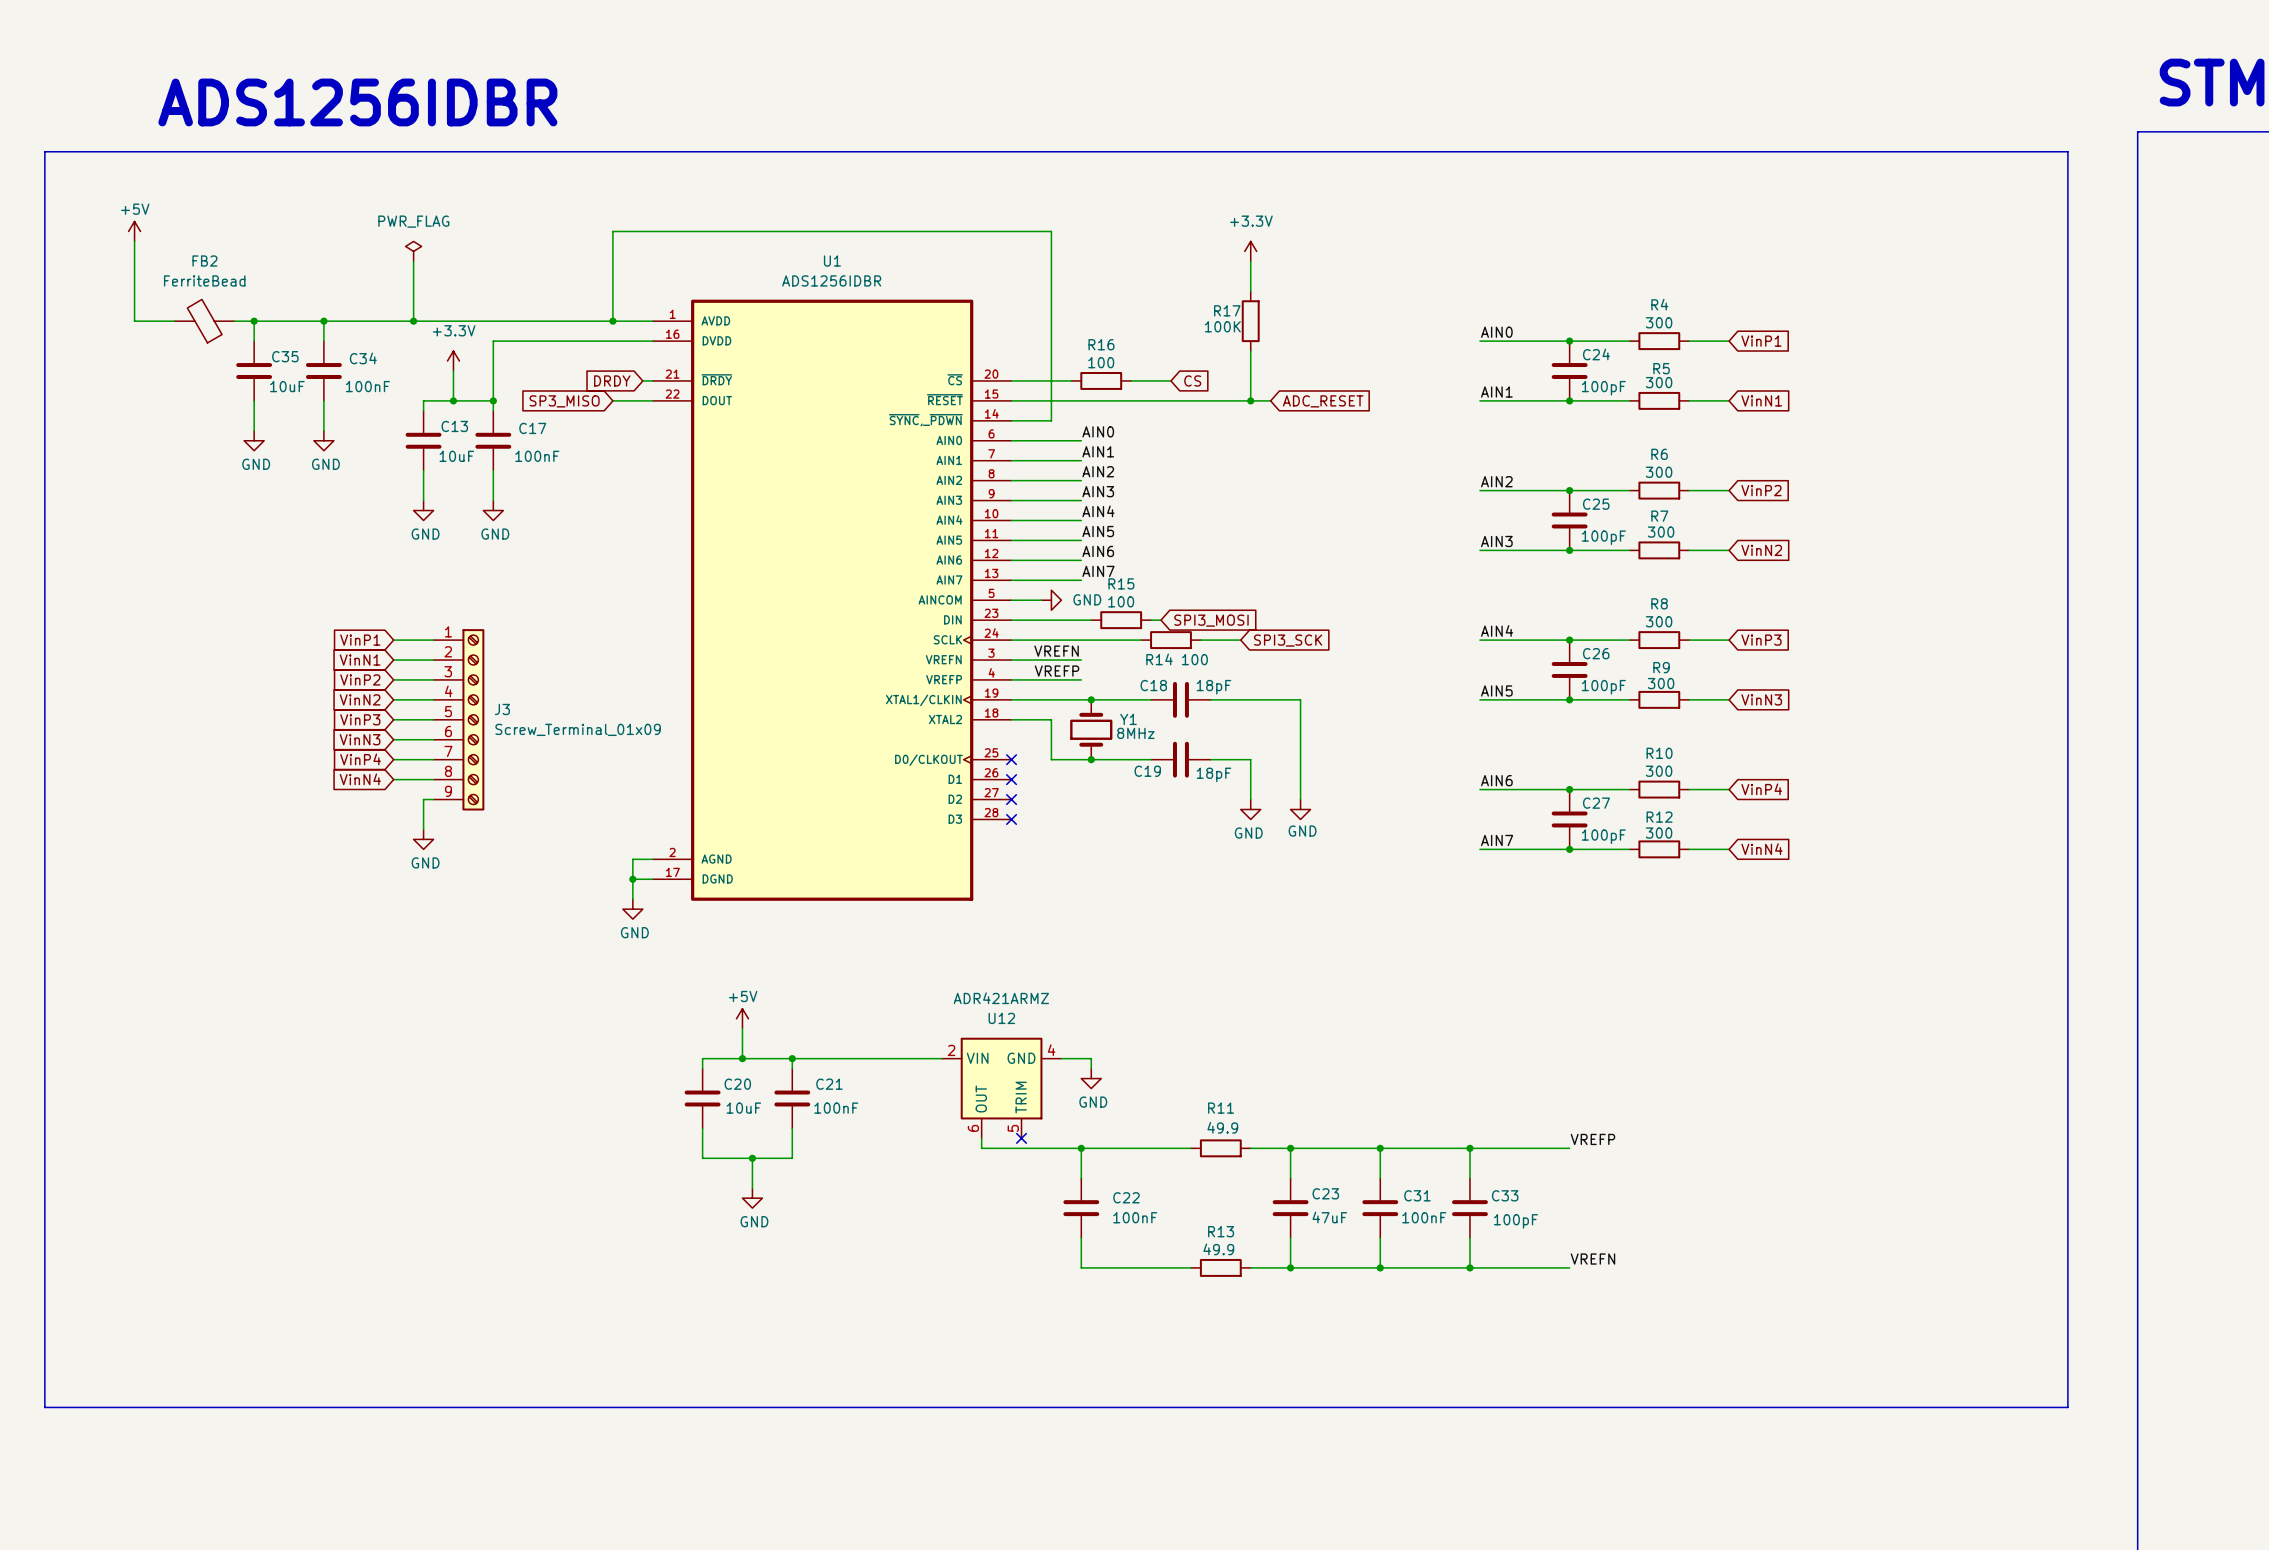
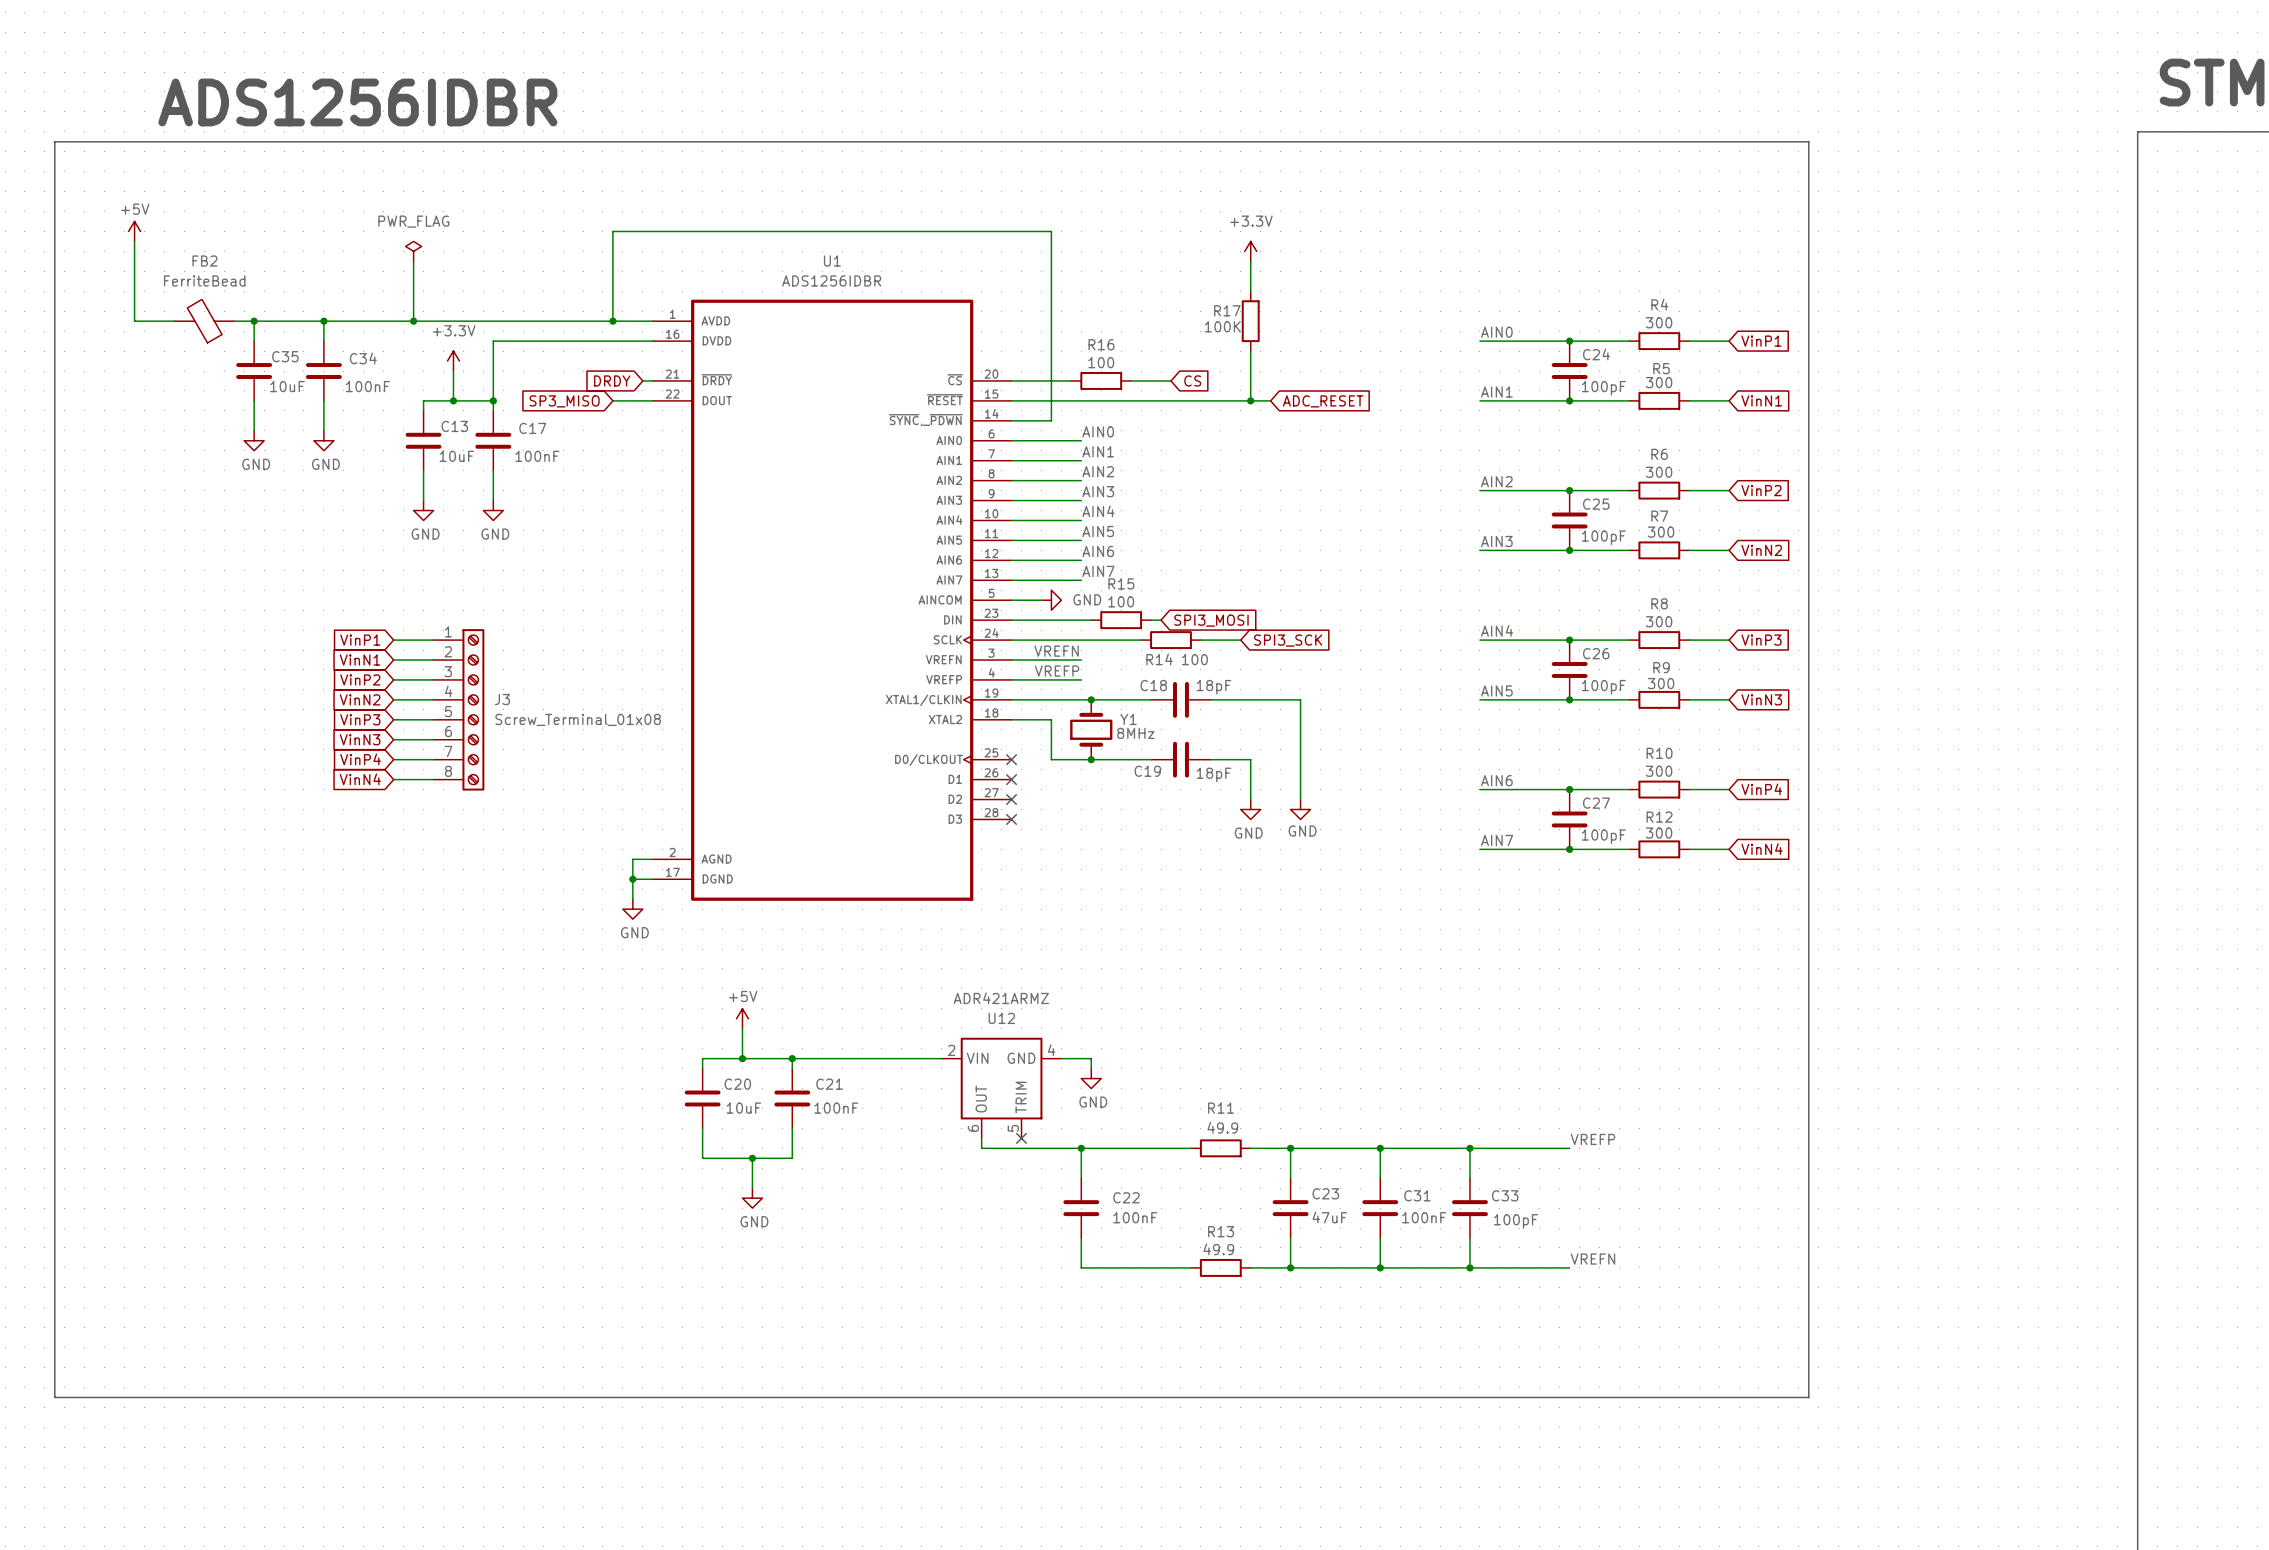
line: (44, 151) (2067, 151) (2067, 1407) (44, 1407) (44, 151) -> (54, 141) (54, 1397) (1808, 1397) (1808, 141) (54, 141)
J3 symbol: [433, 629, 485, 811] -> [433, 629, 485, 791]
J3 value: Screw_Terminal_01x09 (578, 729) -> Screw_Terminal_01x08 (578, 719)
wire: (433, 799) (423, 799) (423, 829) -> none
power symbol: GND (423, 839) -> none

